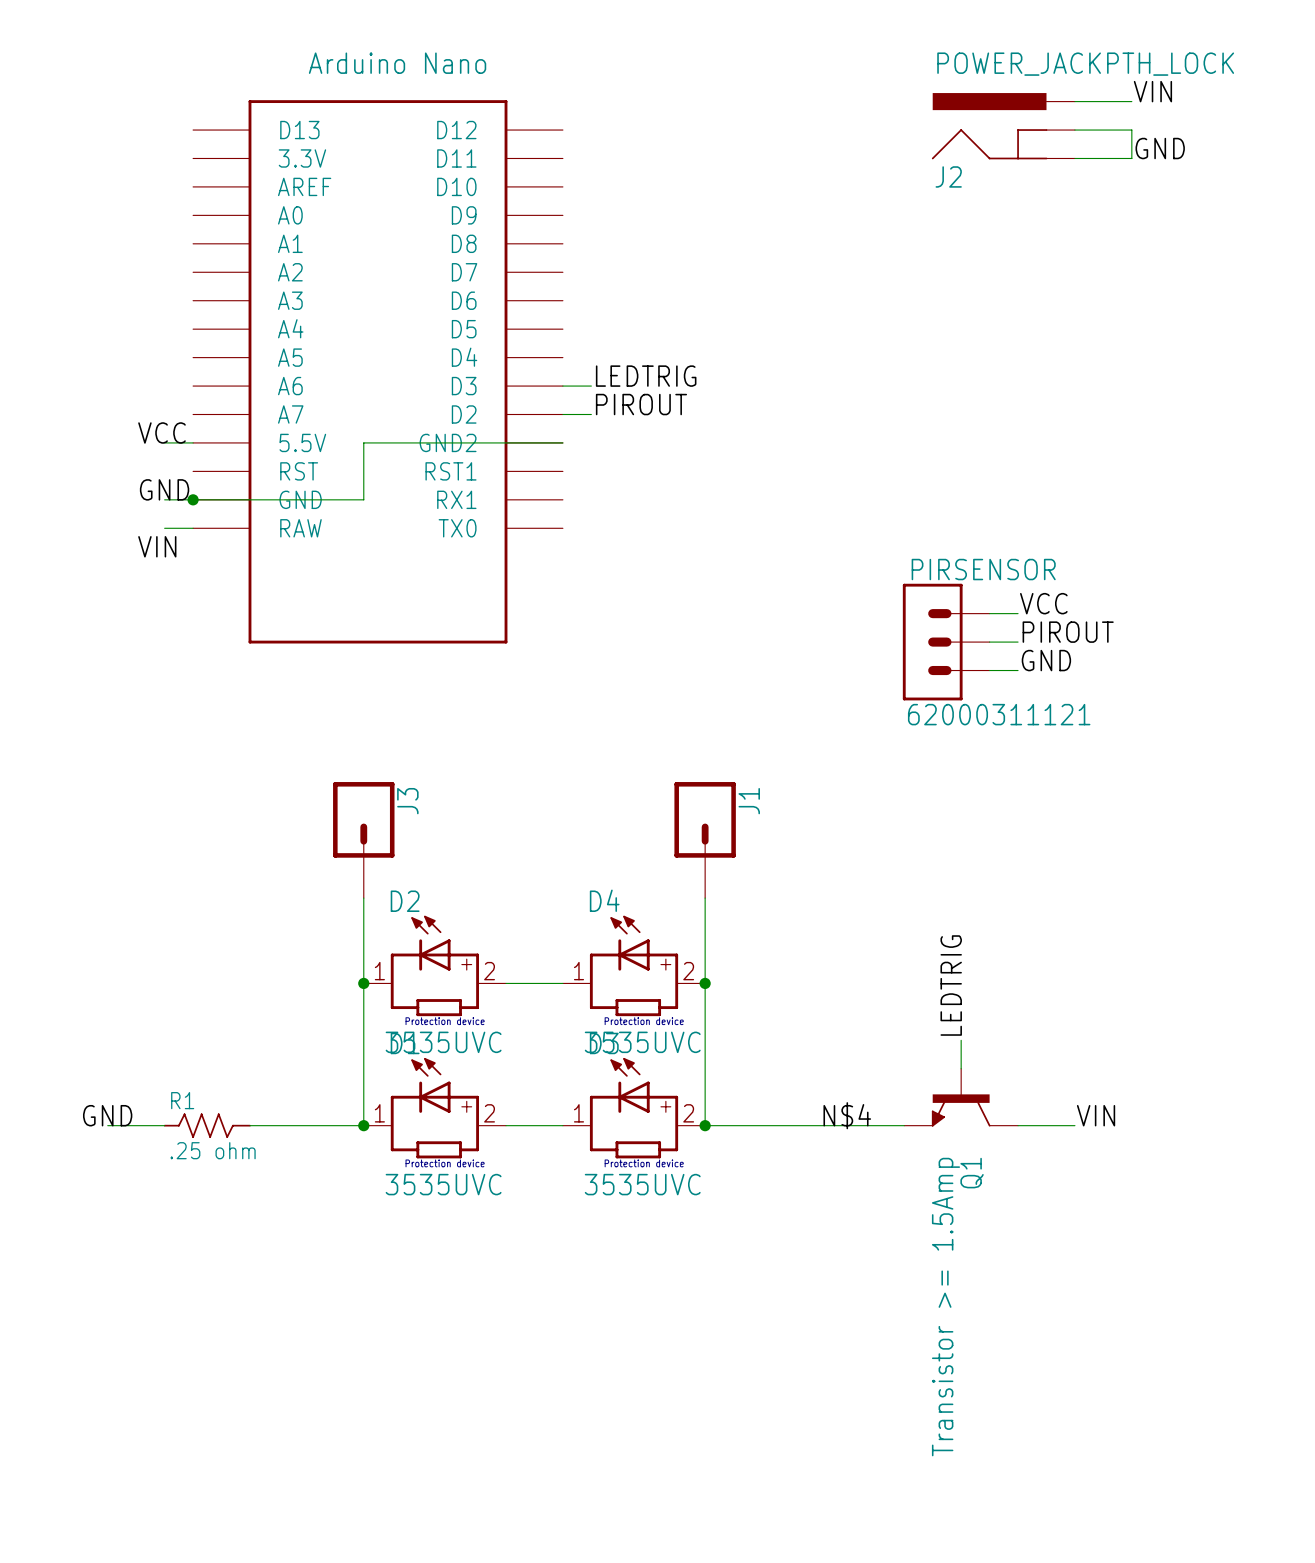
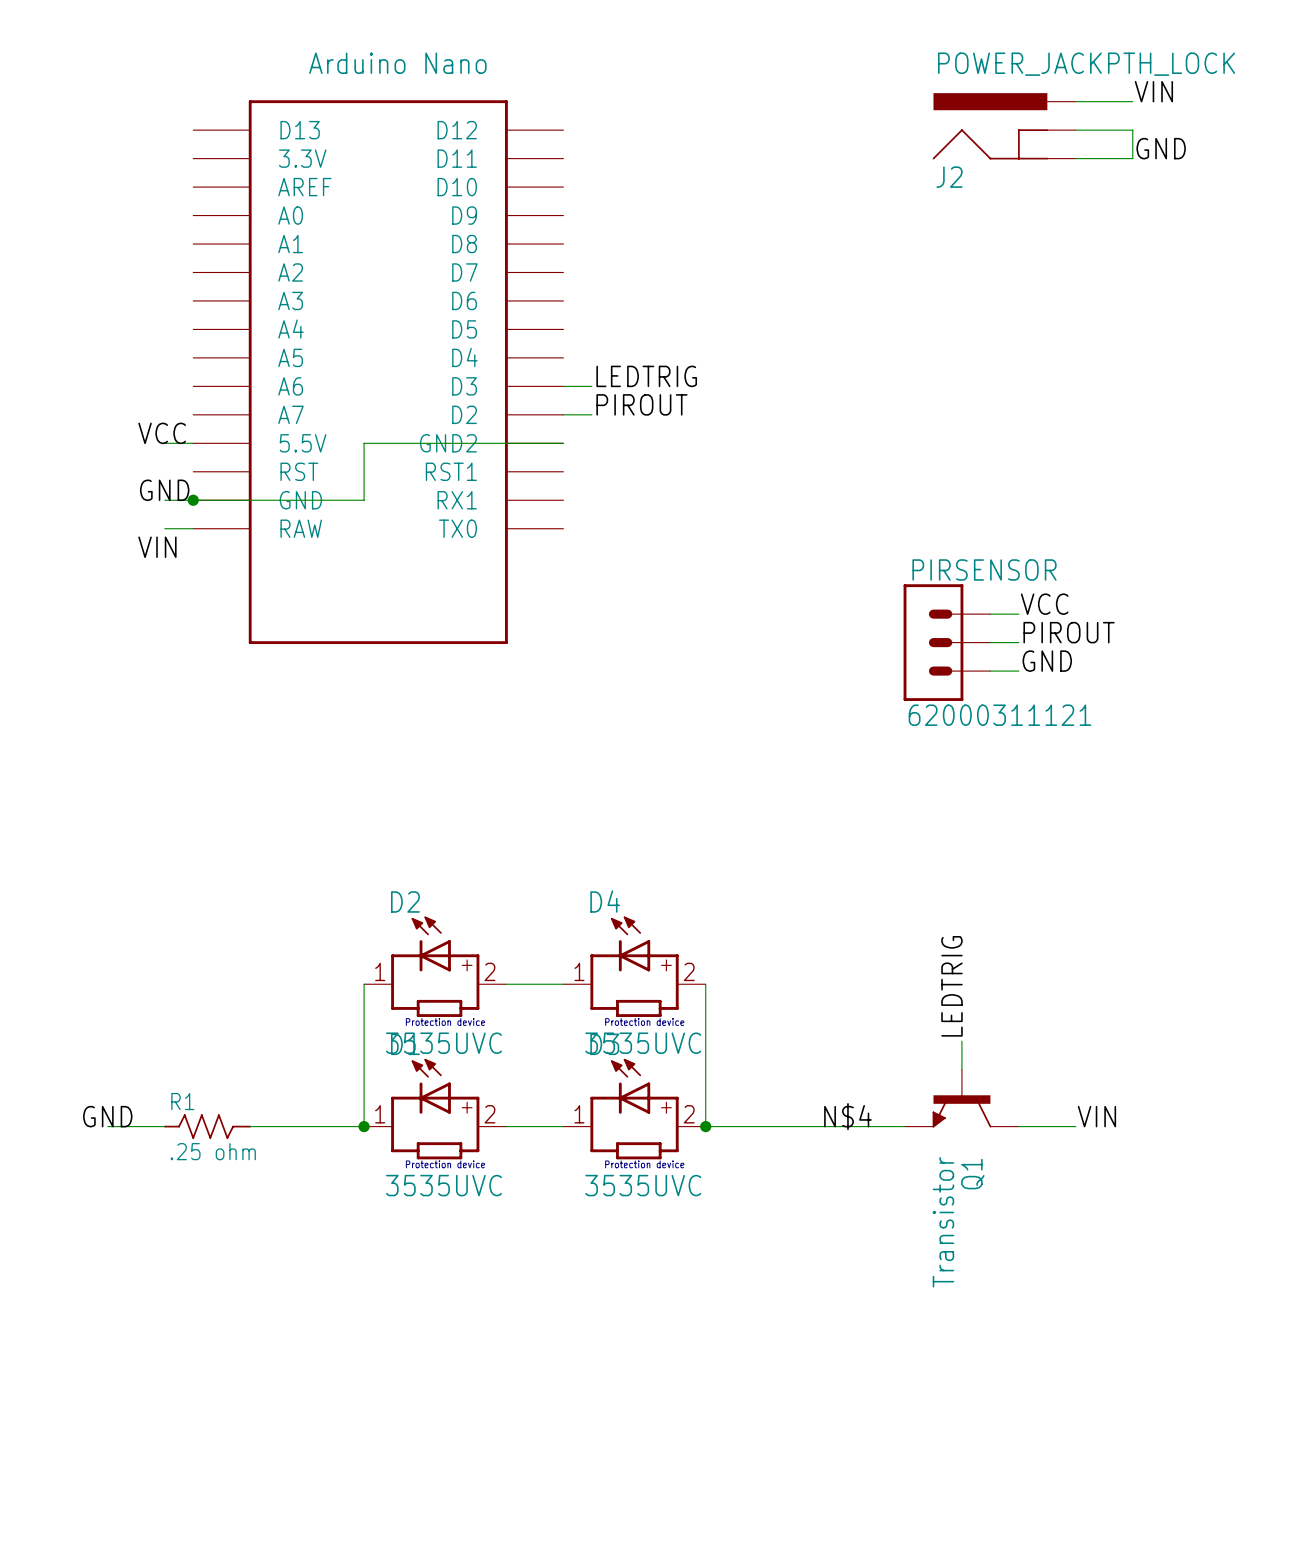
J3: (363, 840) -> none
J1: (705, 840) -> none
wire: (363, 898) (363, 983) -> none
wire: (705, 898) (705, 983) -> none
junction: (363, 983) -> none
junction: (705, 983) -> none
Q1 value: Transistor >= 1.5Amp (945, 1307) -> Transistor (943, 1222)

